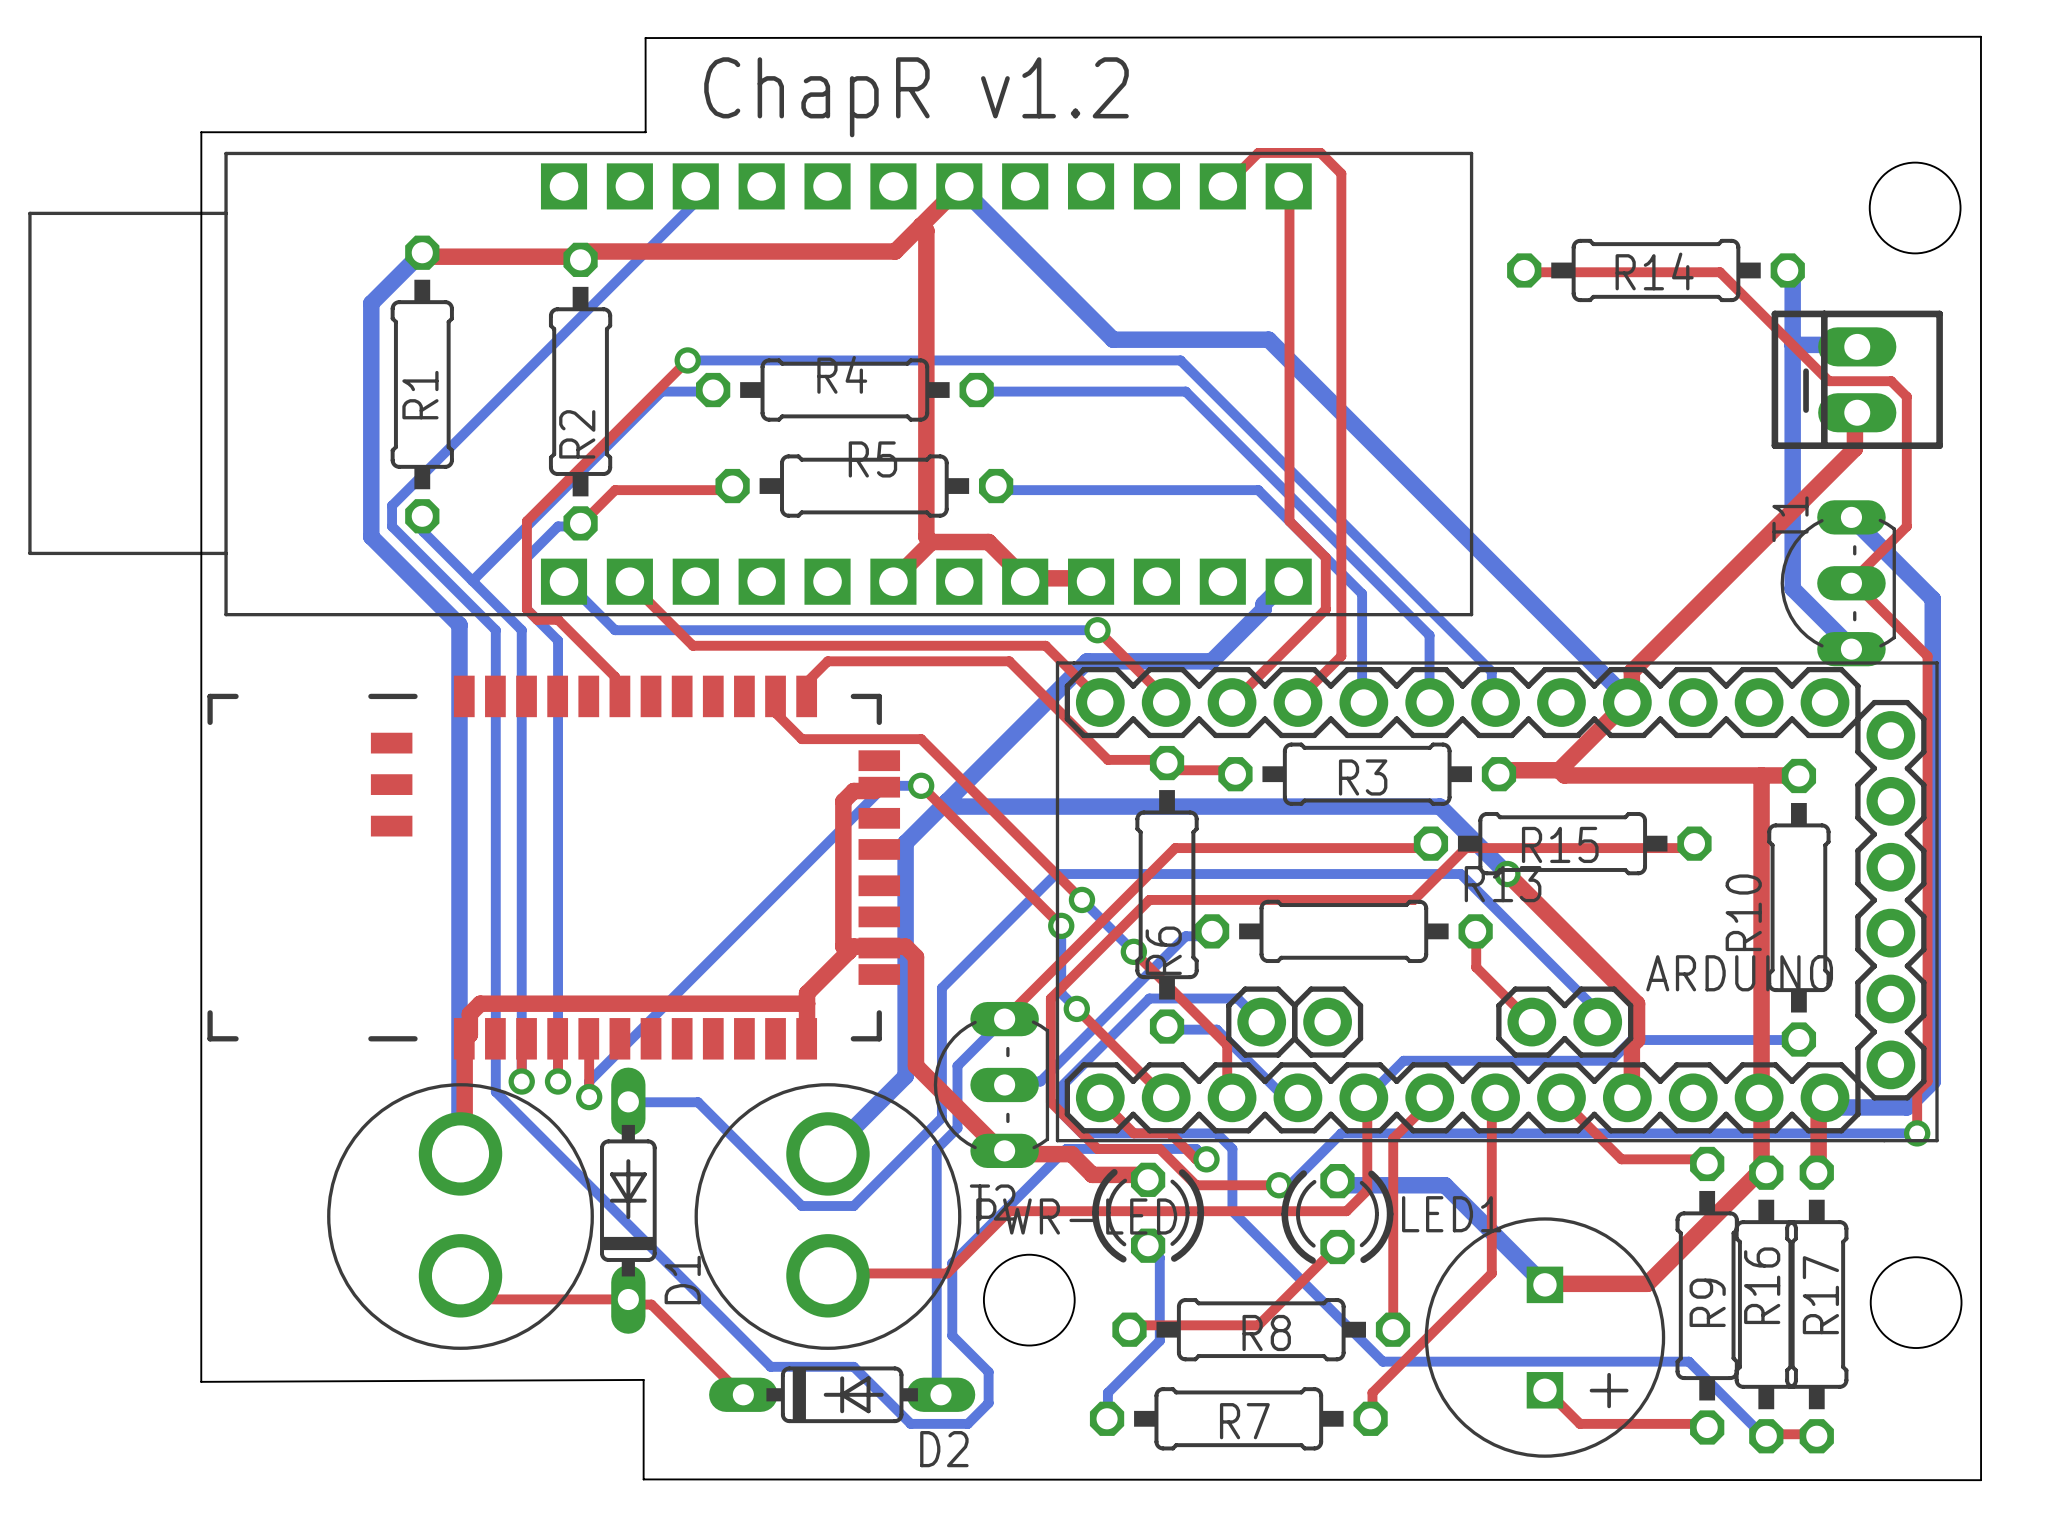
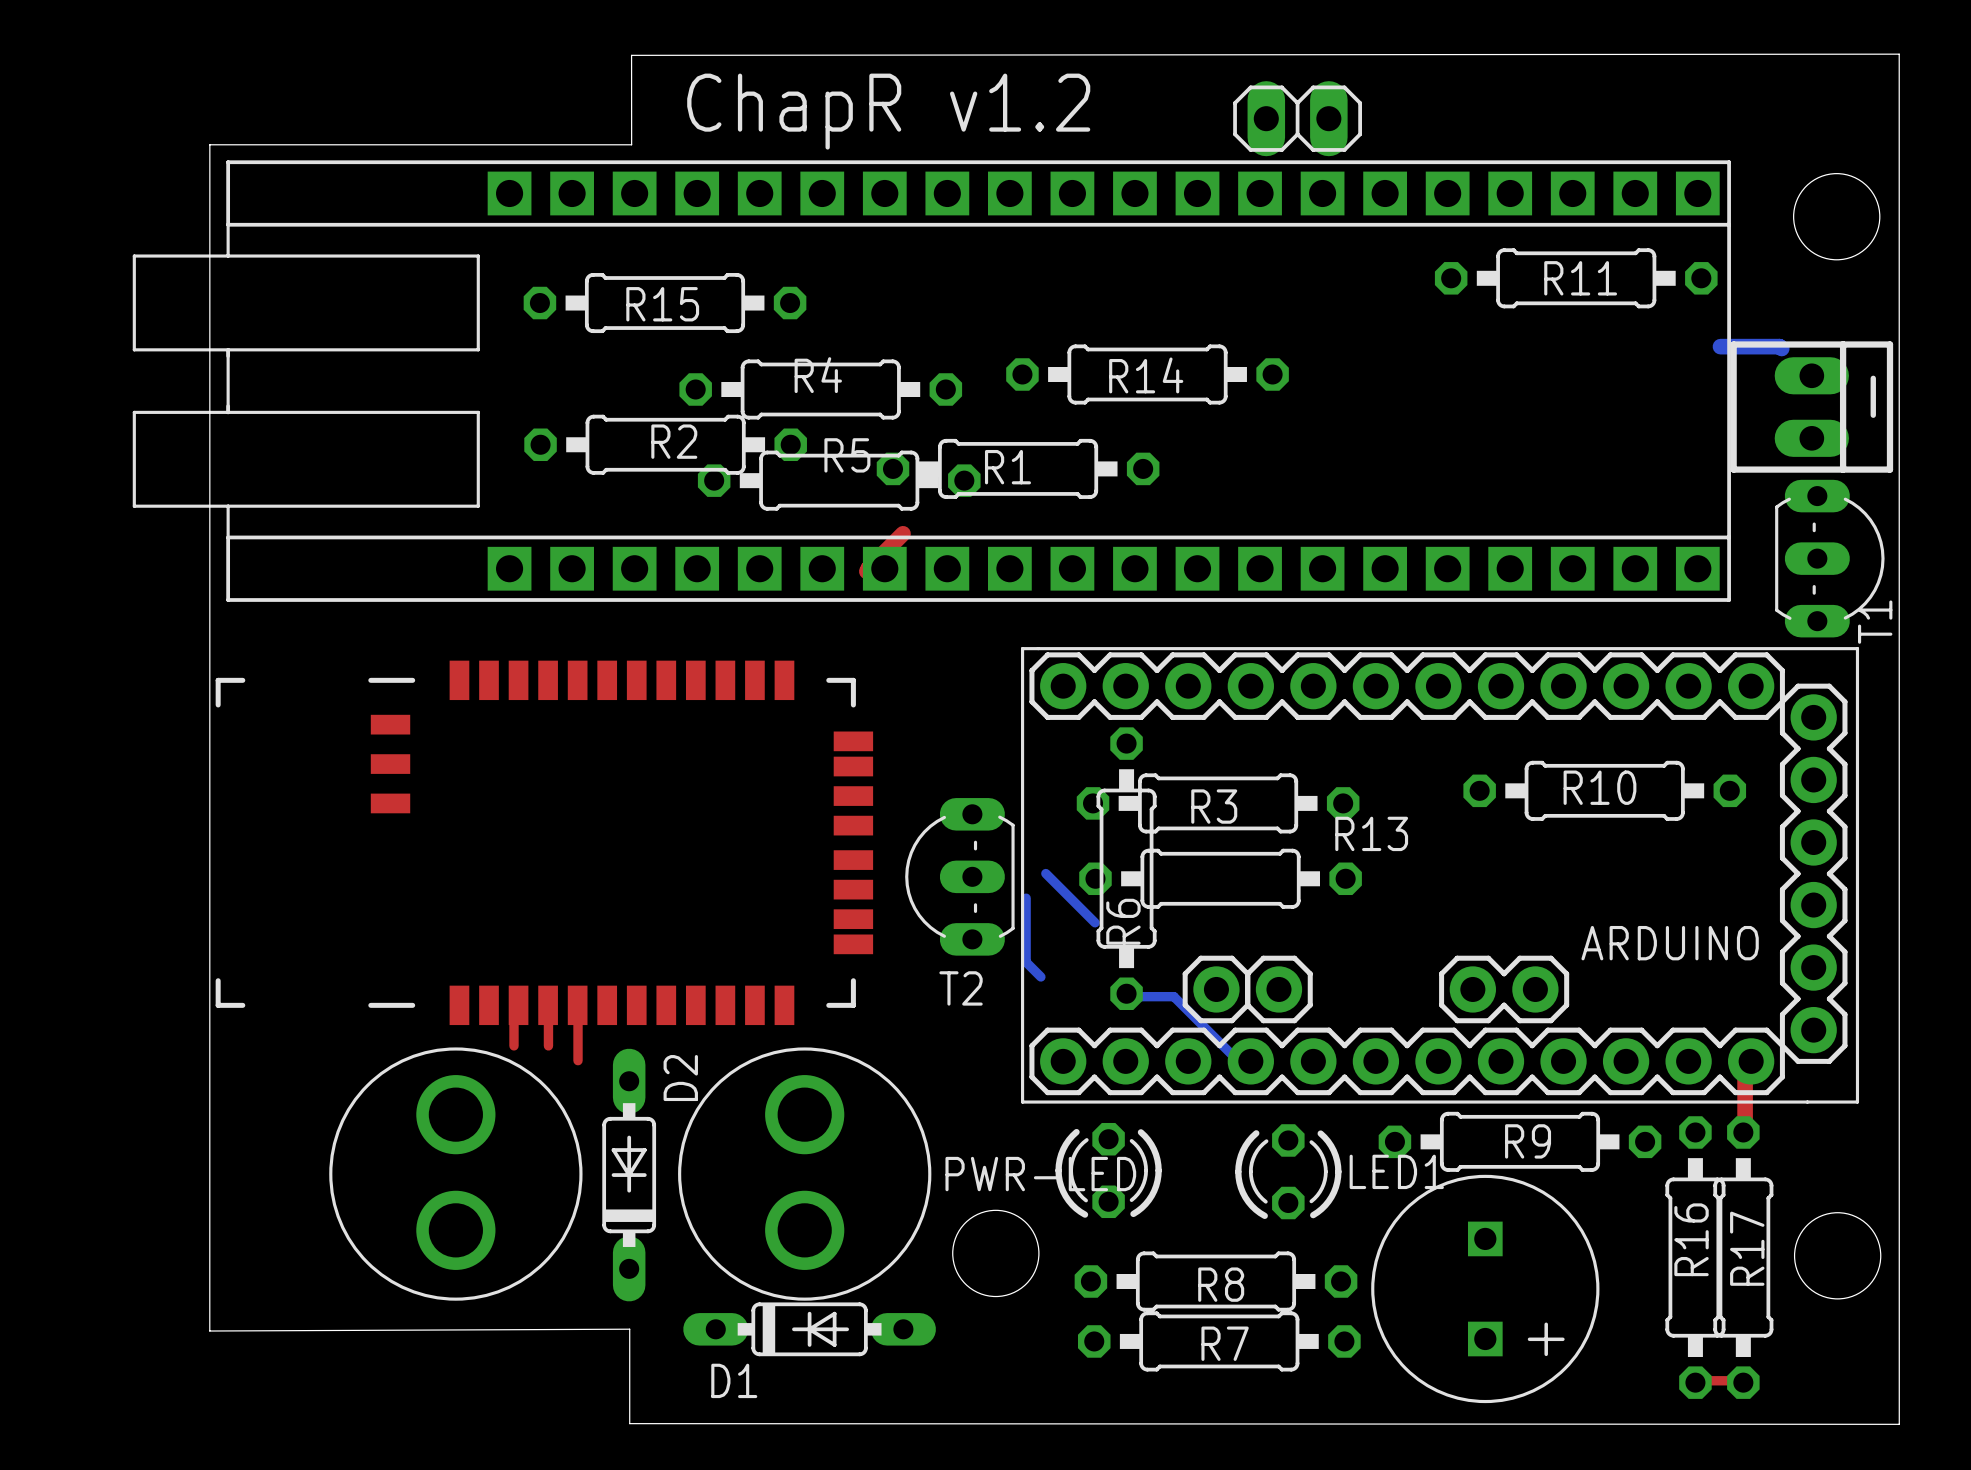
part: none -> (1297, 118)
bottom track: (695, 186) (692, 189) (692, 204) (392, 505) (392, 526) (495, 630) (495, 1091) (770, 1366) (853, 1366) (910, 1423) (967, 1423) (988, 1403) (988, 1372) (952, 1335) (952, 1263) (1066, 1148) (1196, 1148) (1206, 1159) -> none
top track: (959, 186) (895, 251) (583, 251) (580, 259) (578, 256) (423, 256) (422, 252) -> none
bottom track: (959, 186) (1113, 339) (1268, 339) (1626, 697) (1627, 702) -> none
top track: (1222, 186) (1258, 152) (1320, 152) (1341, 173) (1341, 656) (1299, 697) (1297, 702) -> none
top track: (1288, 186) (1289, 521) (1325, 557) (1325, 609) (1232, 702) -> none
top track: (921, 225) (926, 230) (926, 536) (931, 542) (988, 542) (1024, 578) (1025, 581) (1030, 578) (1087, 578) (1091, 581) -> none
bottom track: (422, 252) (371, 303) (371, 536) (459, 625) (460, 1153) -> none
top track: (1524, 270) (1528, 272) (1720, 272) (1828, 381) (1891, 381) (1906, 396) (1906, 526) (1851, 583) (1854, 583) (1927, 656) (1927, 1081) (1917, 1091) (1917, 1133) -> none
R14 position: (1655, 270) -> (1147, 374)
bottom track: (1787, 270) (1792, 272) (1792, 588) (1851, 649) -> none
R11: none -> (1576, 278)
top track: (687, 360) (526, 521) (526, 609) (537, 619) (558, 619) (615, 676) (615, 692) (619, 696) -> none
bottom track: (687, 360) (1180, 360) (1491, 671) (1491, 697) (1495, 702) -> none
via: (687, 360) -> none
part rotation: 0° (1857, 379) -> 180° (1811, 407)
part: none -> (931, 381)
R1 rotation: 0° (422, 384) -> 90° clockwise (1018, 468)
R1 position: (422, 384) -> (1018, 468)
part: (750, 384) -> none
bottom track: (713, 390) (661, 391) (472, 580) -> none
bottom track: (976, 390) (978, 391) (1185, 391) (1429, 635) (1429, 702) -> none
R2 rotation: 0° (580, 391) -> 90° clockwise (665, 444)
top track: (1857, 412) (1854, 417) (1854, 448) (1631, 671) (1631, 697) (1559, 770) -> none
top track: (732, 486) (729, 490) (615, 490) (580, 523) -> none
bottom track: (996, 486) (998, 490) (1258, 490) (1362, 593) (1362, 697) (1363, 702) -> none
bottom track: (422, 516) (423, 531) (521, 630) (521, 1081) -> none
bottom track: (1851, 517) (1932, 599) (1932, 1081) (1906, 1107) (1834, 1107) (1825, 1097) -> none
bottom track: (580, 523) (578, 526) (558, 526) (526, 557) (526, 609) (558, 640) (558, 1081) -> none
bottom track: (564, 581) (568, 583) (615, 630) (1097, 630) -> none
top track: (629, 581) (692, 645) (1045, 645) (1100, 702) -> none
bottom track: (1288, 581) (1284, 583) (1263, 604) (1263, 609) (1211, 661) (1087, 661) (905, 842) (905, 1076) (827, 1153) -> none
T1 rotation: 0° (1838, 583) -> 180° (1829, 558)
top track: (1097, 630) (1164, 697) (1166, 702) -> none
via: (1097, 630) -> none
top track: (775, 696) (775, 713) (801, 739) (921, 739) (1081, 899) -> none
top track: (806, 696) (807, 682) (827, 661) (1009, 661) (1107, 759) (1164, 759) (1175, 770) (1232, 770) (1235, 774) -> none
top track: (1559, 770) (1502, 770) (1498, 774) -> none
top track: (1559, 770) (1564, 775) (1798, 775) -> none
R3 position: (1367, 774) -> (1218, 803)
top track: (1761, 775) (1761, 1091) (1759, 1097) (1761, 1102) (1761, 1169) (1766, 1172) (1756, 1174) (1647, 1283) (1544, 1284) -> none
top track: (921, 785) (1061, 925) -> none
bottom track: (921, 785) (884, 785) (589, 1081) (589, 1097) -> none
via: (921, 785) -> none
top track: (879, 787) (874, 791) (853, 791) (843, 801) (843, 946) (848, 951) -> none
bottom track: (947, 801) (952, 806) (1439, 806) (1507, 874) -> none
top track: (1430, 843) (1429, 848) (1175, 848) (1004, 1019) -> none
R15 position: (1562, 843) -> (665, 303)
top track: (1694, 843) (1694, 848) (1465, 848) (1413, 899) (1149, 899) (1050, 998) (1050, 1102) (1097, 1148) (1159, 1148) (1196, 1185) (1279, 1185) -> none
top track: (1507, 874) (1637, 1003) (1637, 1040) (1631, 1045) (1631, 1097) (1627, 1097) -> none
via: (1507, 874) -> none
via: (1081, 899) -> none
R10 rotation: 0° (1798, 907) -> 90° clockwise (1604, 790)
via: (1061, 925) -> none
bottom track: (1212, 931) (1211, 936) (1185, 936) (1040, 1081) (1009, 1081) (1004, 1084) -> none
R13 position: (1343, 931) -> (1220, 878)
top track: (1475, 931) (1476, 967) (1531, 1022) -> none
top track: (1133, 951) (1227, 1045) (1227, 1097) (1232, 1097) -> none
via: (1133, 951) -> none
top track: (807, 1003) (480, 1003) (469, 1014) (469, 1034) (464, 1038) (464, 1148) (460, 1153) -> none
top track: (1076, 1008) (1166, 1097) -> none
via: (1076, 1008) -> none
bottom track: (1004, 1019) (957, 1065) (957, 1128) (936, 1148) (936, 1392) (941, 1394) -> none
bottom track: (1261, 1022) (1237, 998) (1149, 998) (1061, 1086) (1061, 1112) (1081, 1133) (1216, 1133) (1232, 1148) (1232, 1211) (1382, 1361) (1688, 1361) (1761, 1434) (1766, 1436) -> none
bottom track: (1597, 1022) (1595, 1019) (1595, 1008) (1460, 874) (1056, 874) (941, 988) (941, 1117) (853, 1206) (801, 1206) (698, 1102) (628, 1101) -> none
top track: (806, 1038) (807, 993) (853, 946) (905, 946) (915, 957) (915, 1065) (998, 1148) (1009, 1154) (1071, 1154) (1092, 1174) (1144, 1174) (1148, 1179) -> none
bottom track: (1798, 1039) (1631, 1040) (1611, 1060) (1403, 1060) (1367, 1097) (1363, 1097) -> none
via: (521, 1081) -> none
via: (558, 1081) -> none
T2 position: (991, 1084) -> (959, 876)
via: (589, 1097) -> none
top track: (1100, 1097) (1133, 1133) (1170, 1133) (1196, 1159) (1206, 1159) -> none
top track: (1363, 1097) (1367, 1102) (1367, 1190) (1346, 1211) (1009, 1211) (947, 1273) (832, 1273) (827, 1275) -> none
top track: (1429, 1097) (1429, 1102) (1393, 1138) (1393, 1329) -> none
top track: (1495, 1097) (1491, 1102) (1491, 1273) (1372, 1392) (1372, 1418) (1370, 1418) -> none
top track: (1561, 1097) (1621, 1159) (1704, 1159) (1707, 1163) -> none
bottom track: (1917, 1133) (1341, 1133) (1289, 1185) (1279, 1185) -> none
via: (1917, 1133) -> none
via: (1206, 1159) -> none
bottom track: (1337, 1181) (1341, 1185) (1445, 1185) (1544, 1284) -> none
via: (1279, 1185) -> none
D1 rotation: 0° (628, 1200) -> 90° clockwise (809, 1329)
D1 position: (628, 1200) -> (809, 1329)
bottom track: (1148, 1245) (1159, 1257) (1159, 1340) (1107, 1392) (1107, 1418) -> none
top track: (1337, 1247) (1258, 1325) (1133, 1325) (1129, 1329) -> none
top track: (460, 1275) (485, 1299) (625, 1299) (628, 1299) (630, 1304) (651, 1304) (743, 1394) -> none
R9 rotation: 0° (1707, 1295) -> 90° clockwise (1520, 1141)
top track: (1544, 1390) (1579, 1423) (1704, 1423) (1707, 1427) -> none
D2 rotation: 0° (842, 1394) -> 90° counterclockwise (629, 1175)
D2 position: (842, 1394) -> (629, 1175)
R7 position: (1238, 1418) -> (1219, 1341)

